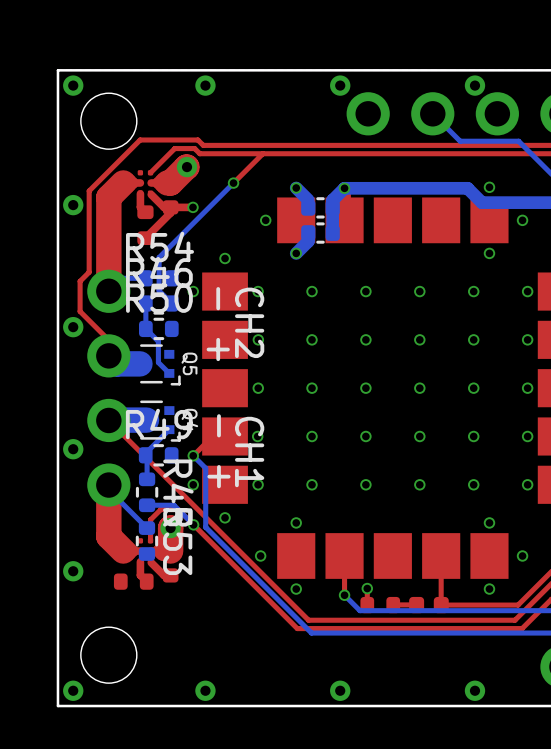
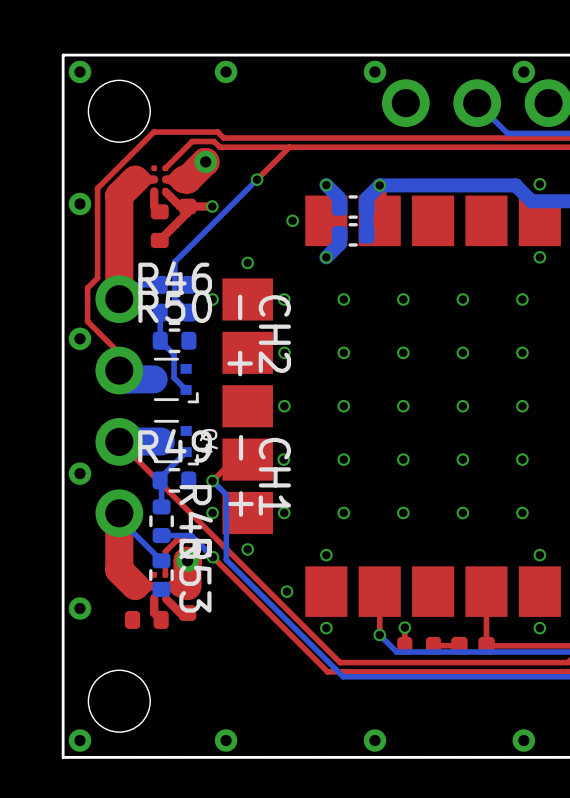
R54 name: R54 (160, 247) -> none
Q5 name: Q5 (189, 363) -> none

